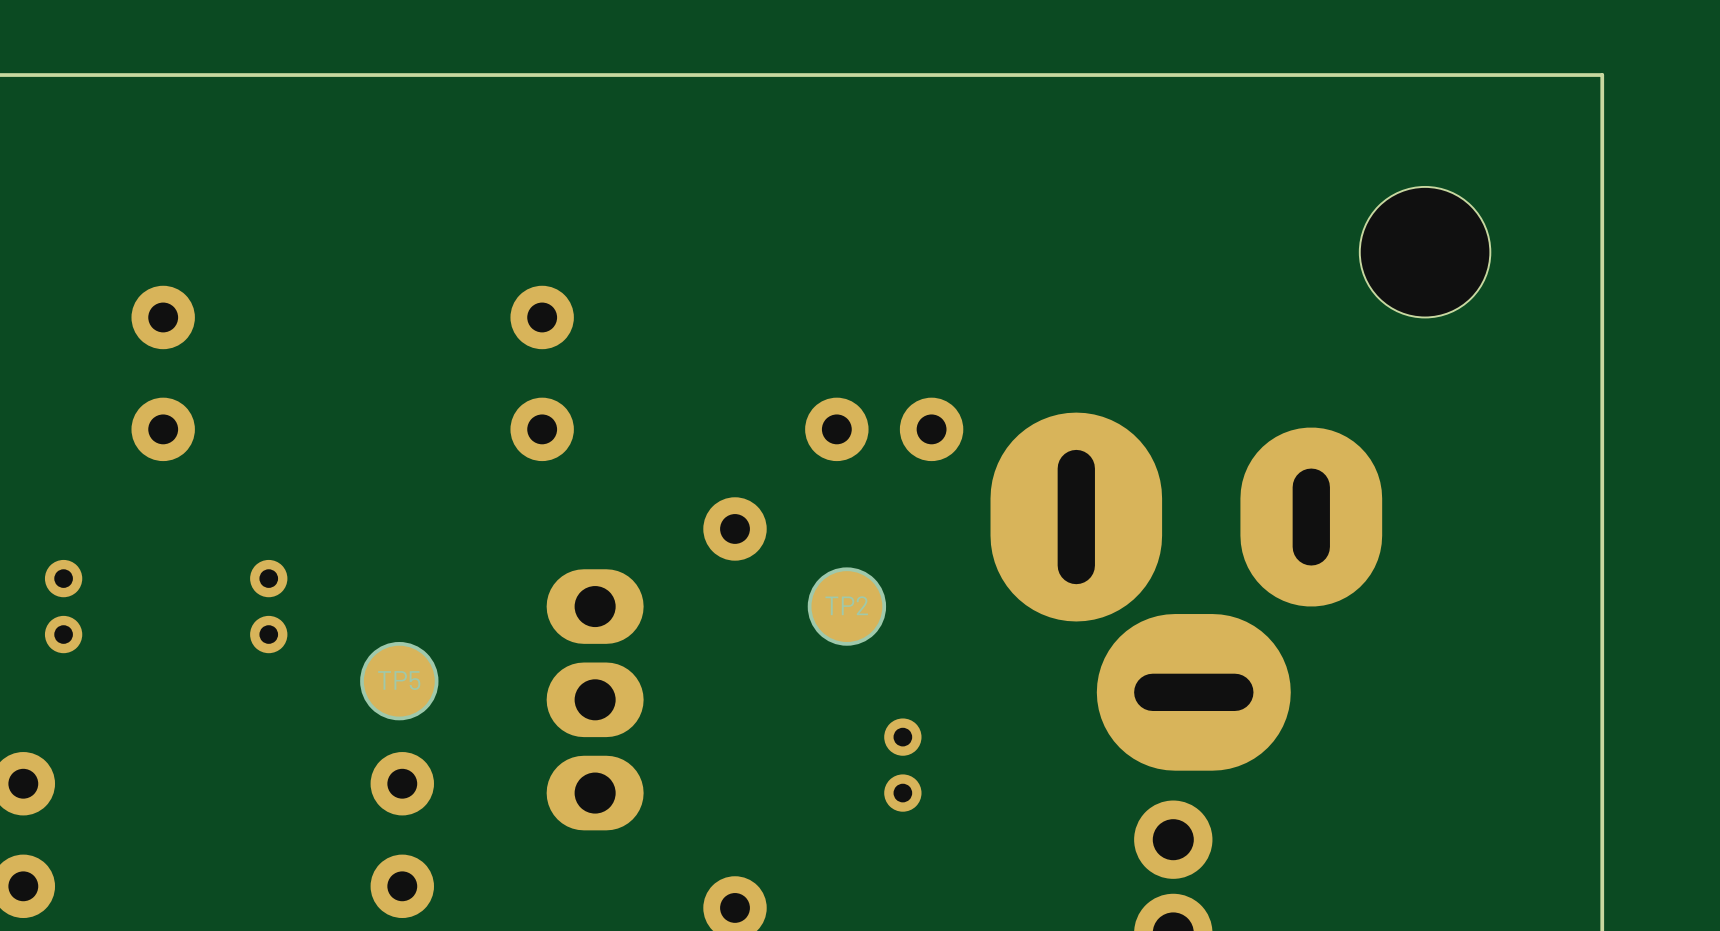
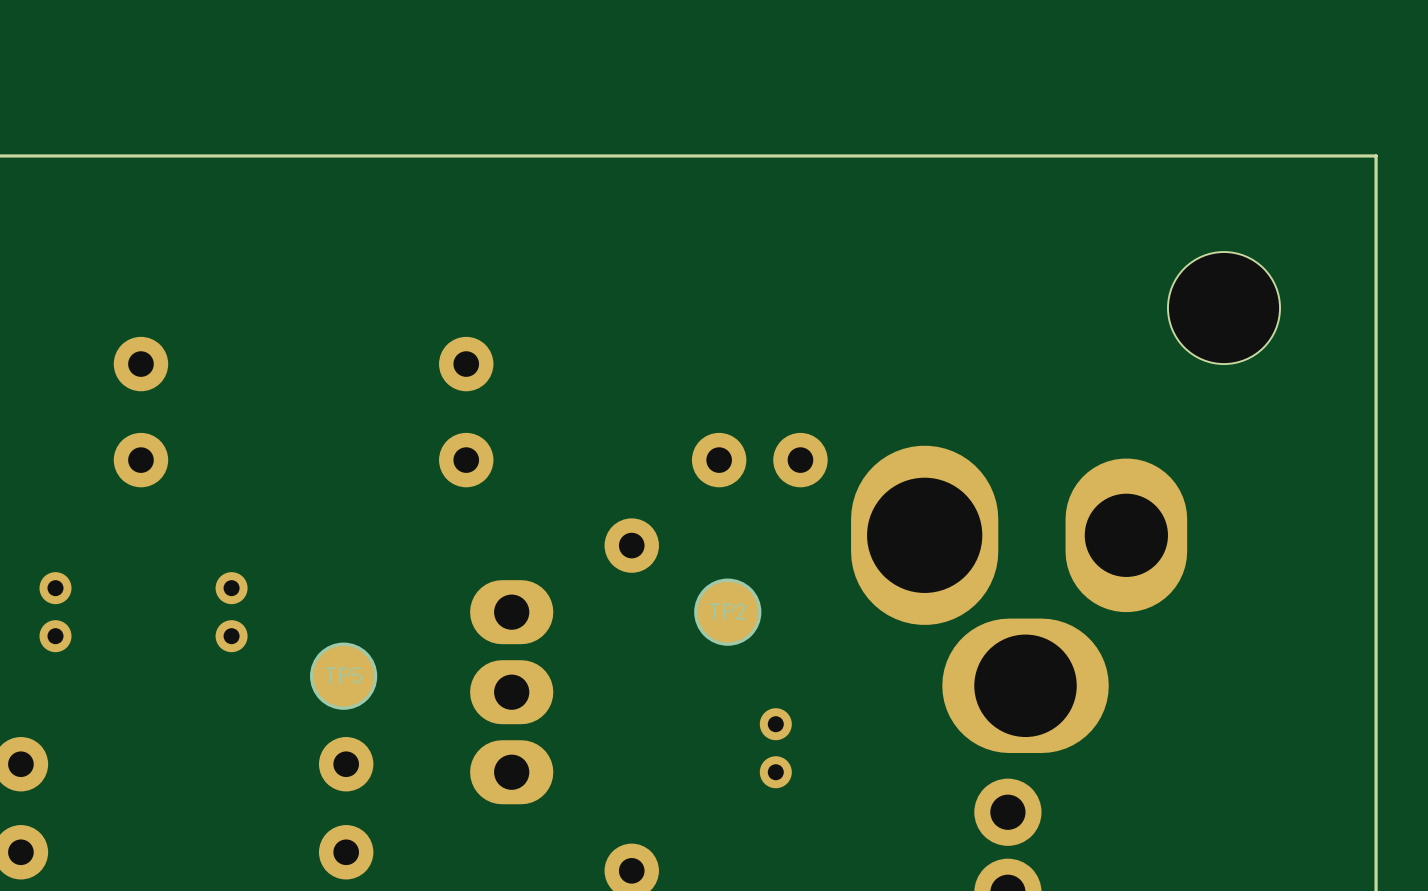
part footprint: [990, 412, 1383, 771] -> [851, 445, 1188, 754]

